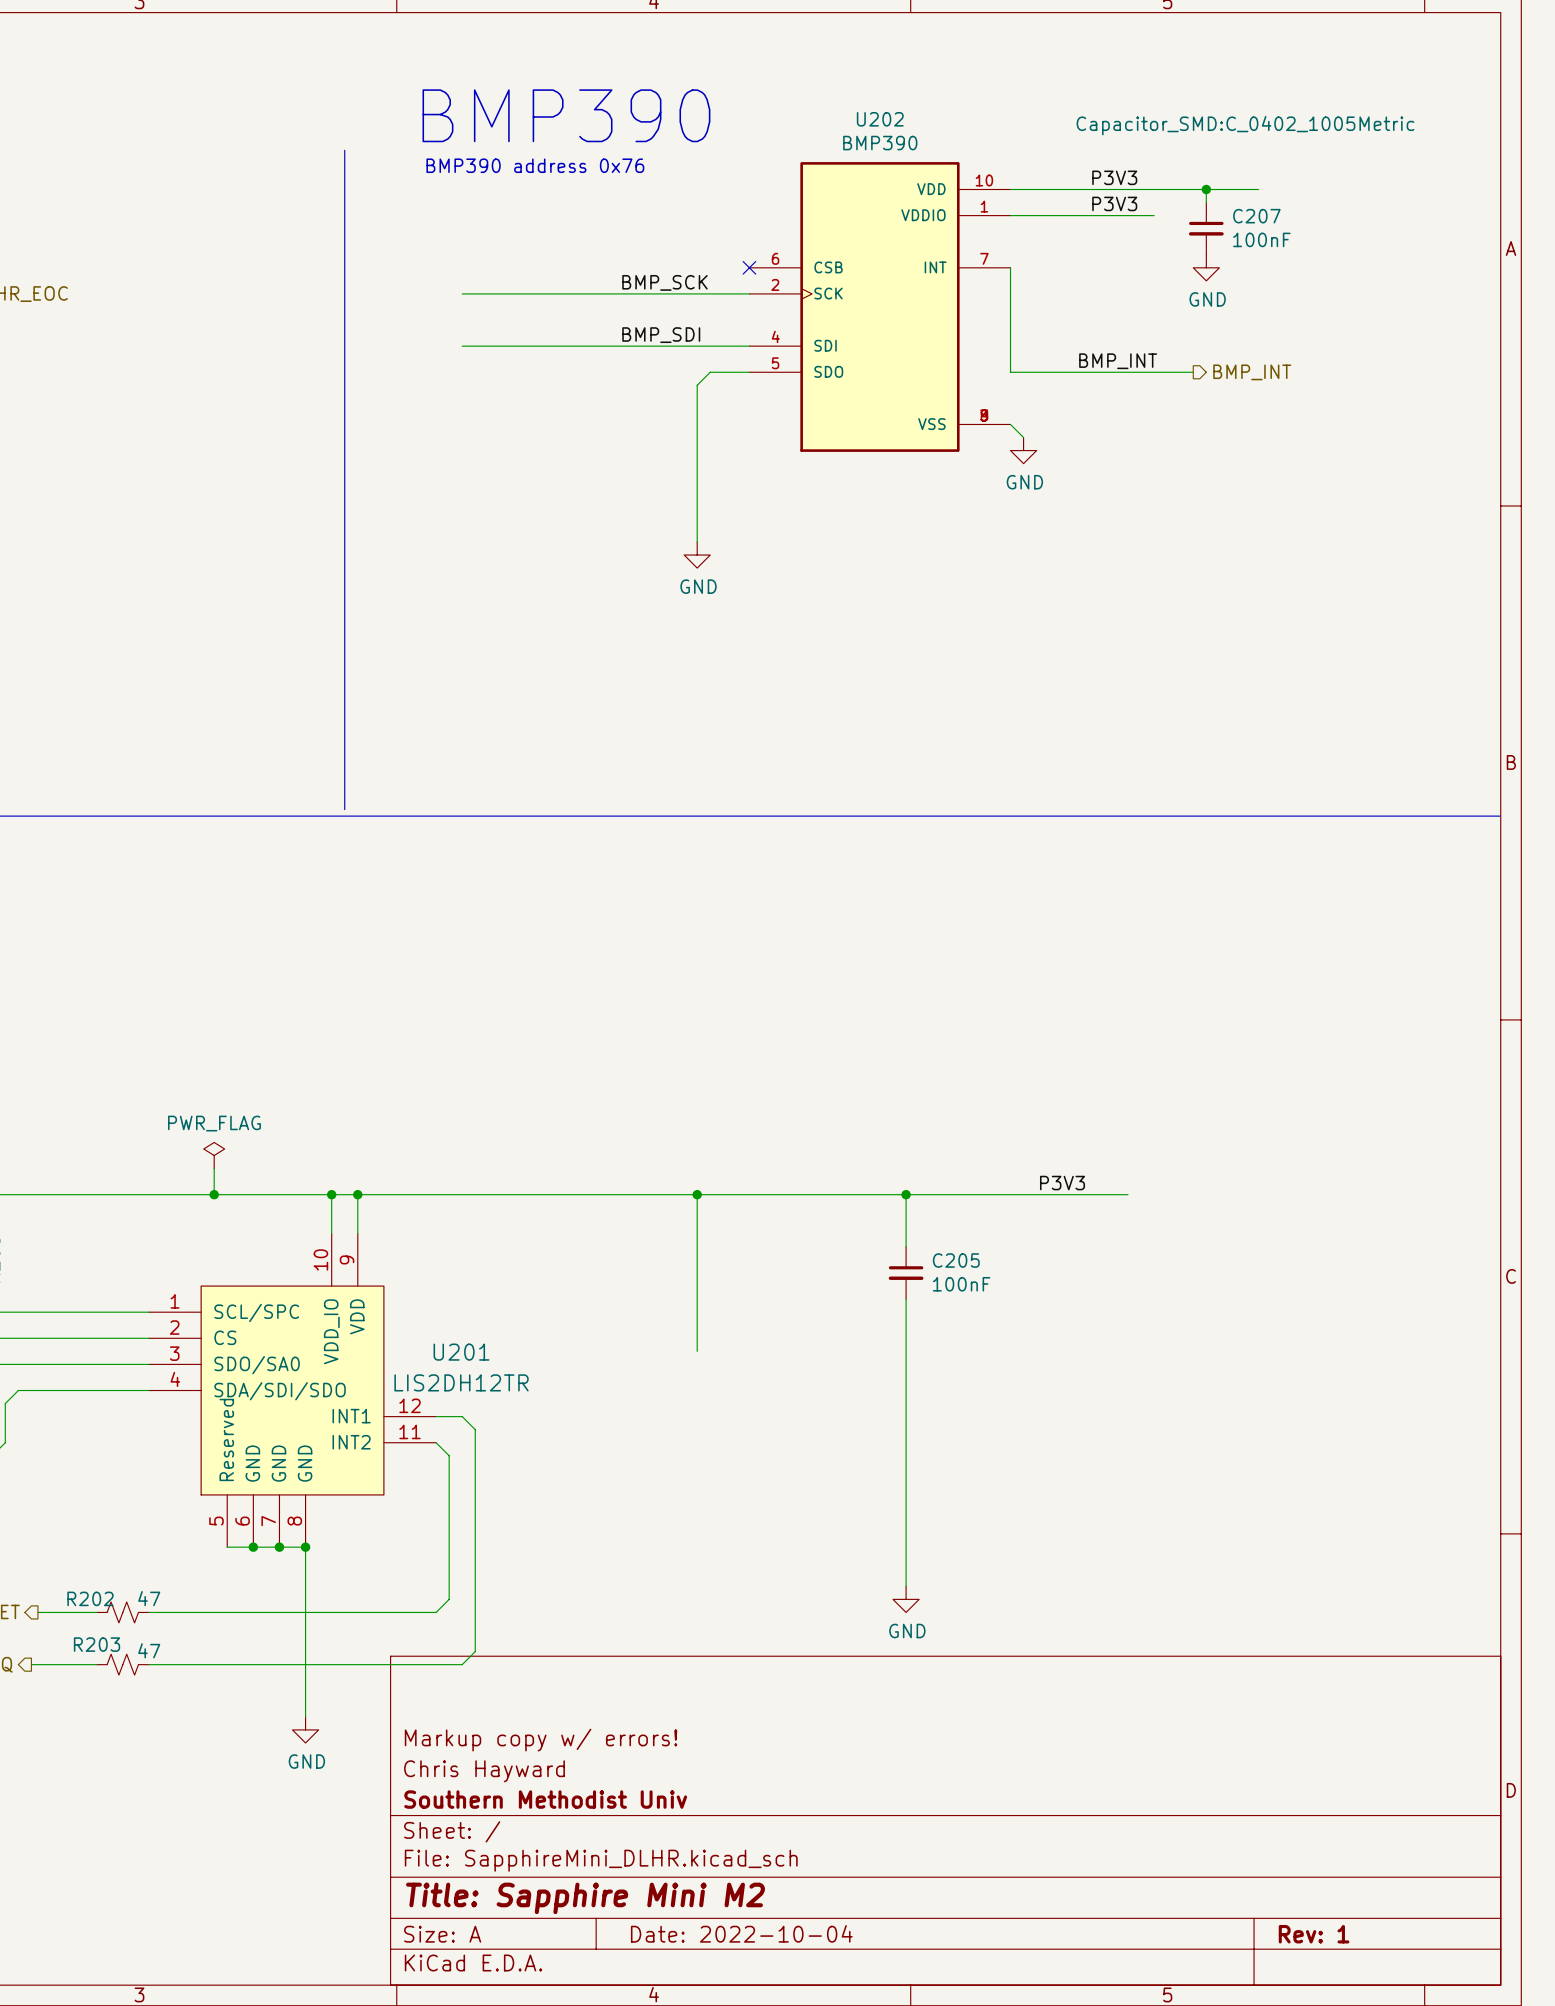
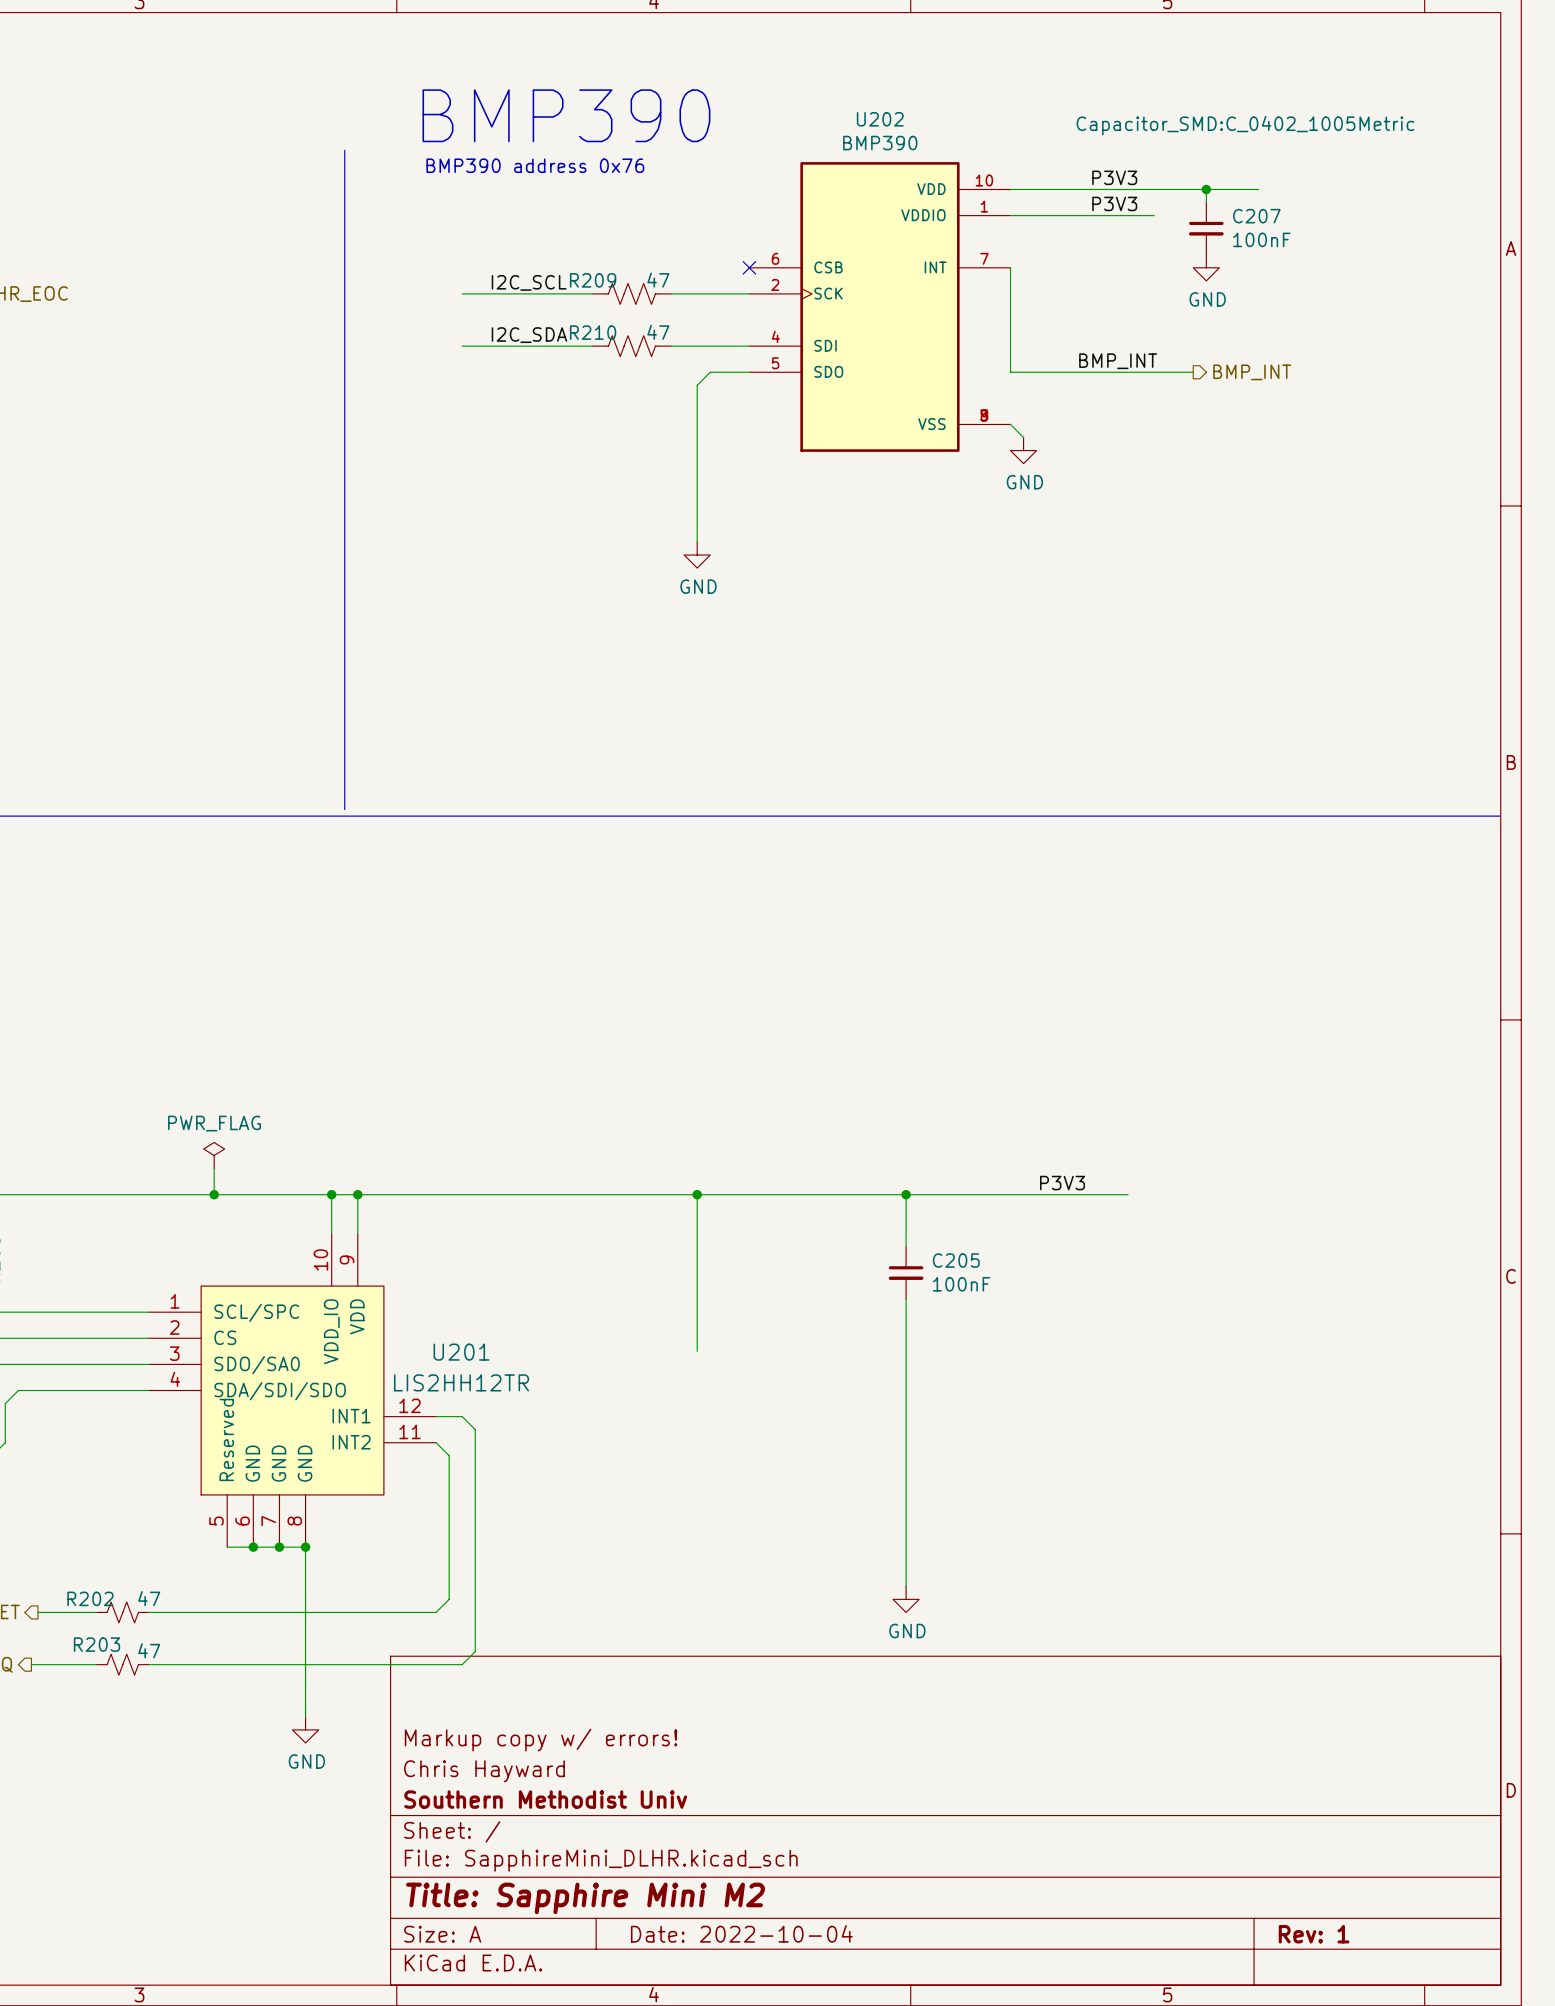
label: none -> I2C_SCL (529, 282)
label: BMP_SCK (664, 282) -> none
R209: none -> 47 (631, 293)
label: none -> I2C_SDA (529, 335)
label: BMP_SDI (661, 335) -> none
R210: none -> 47 (631, 346)
U201 value: LIS2DH12TR (461, 1382) -> LIS2HH12TR (461, 1382)

